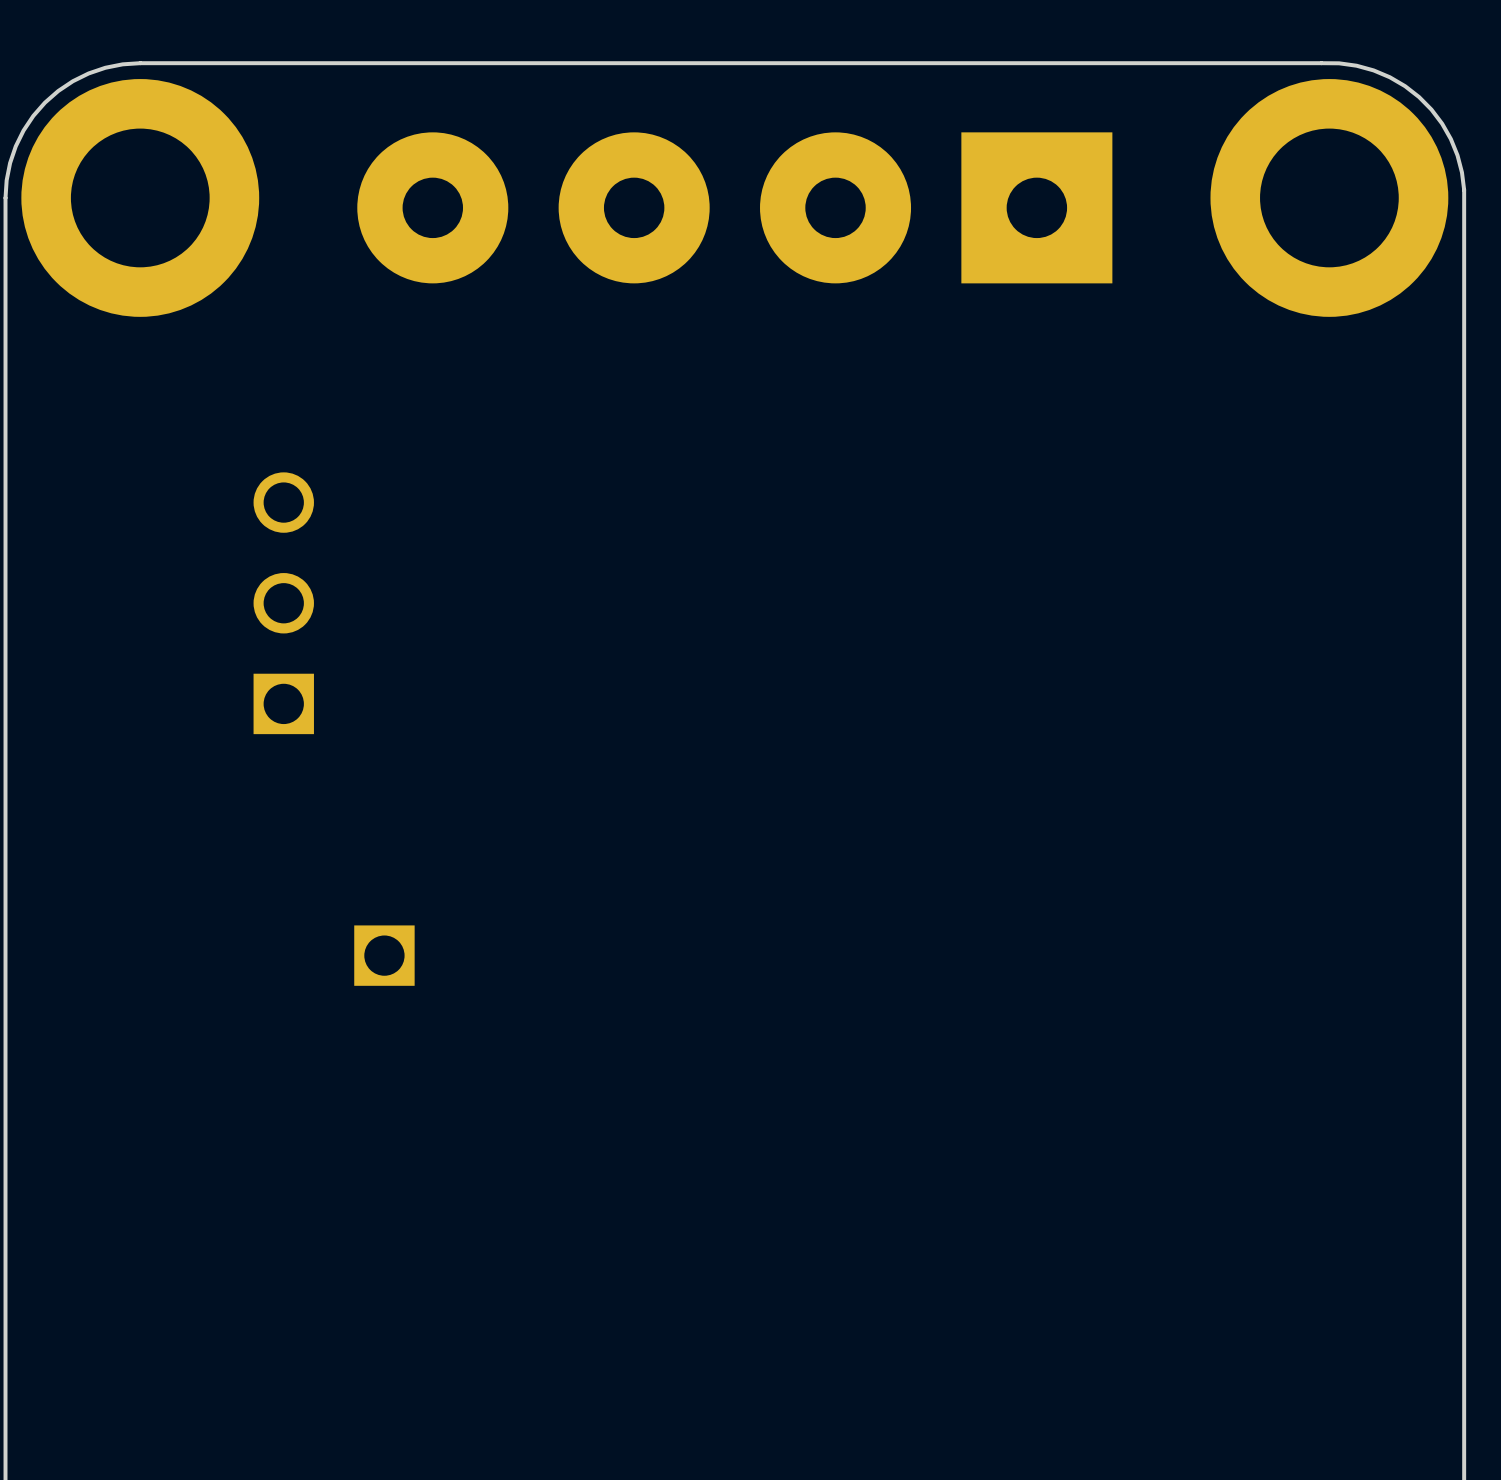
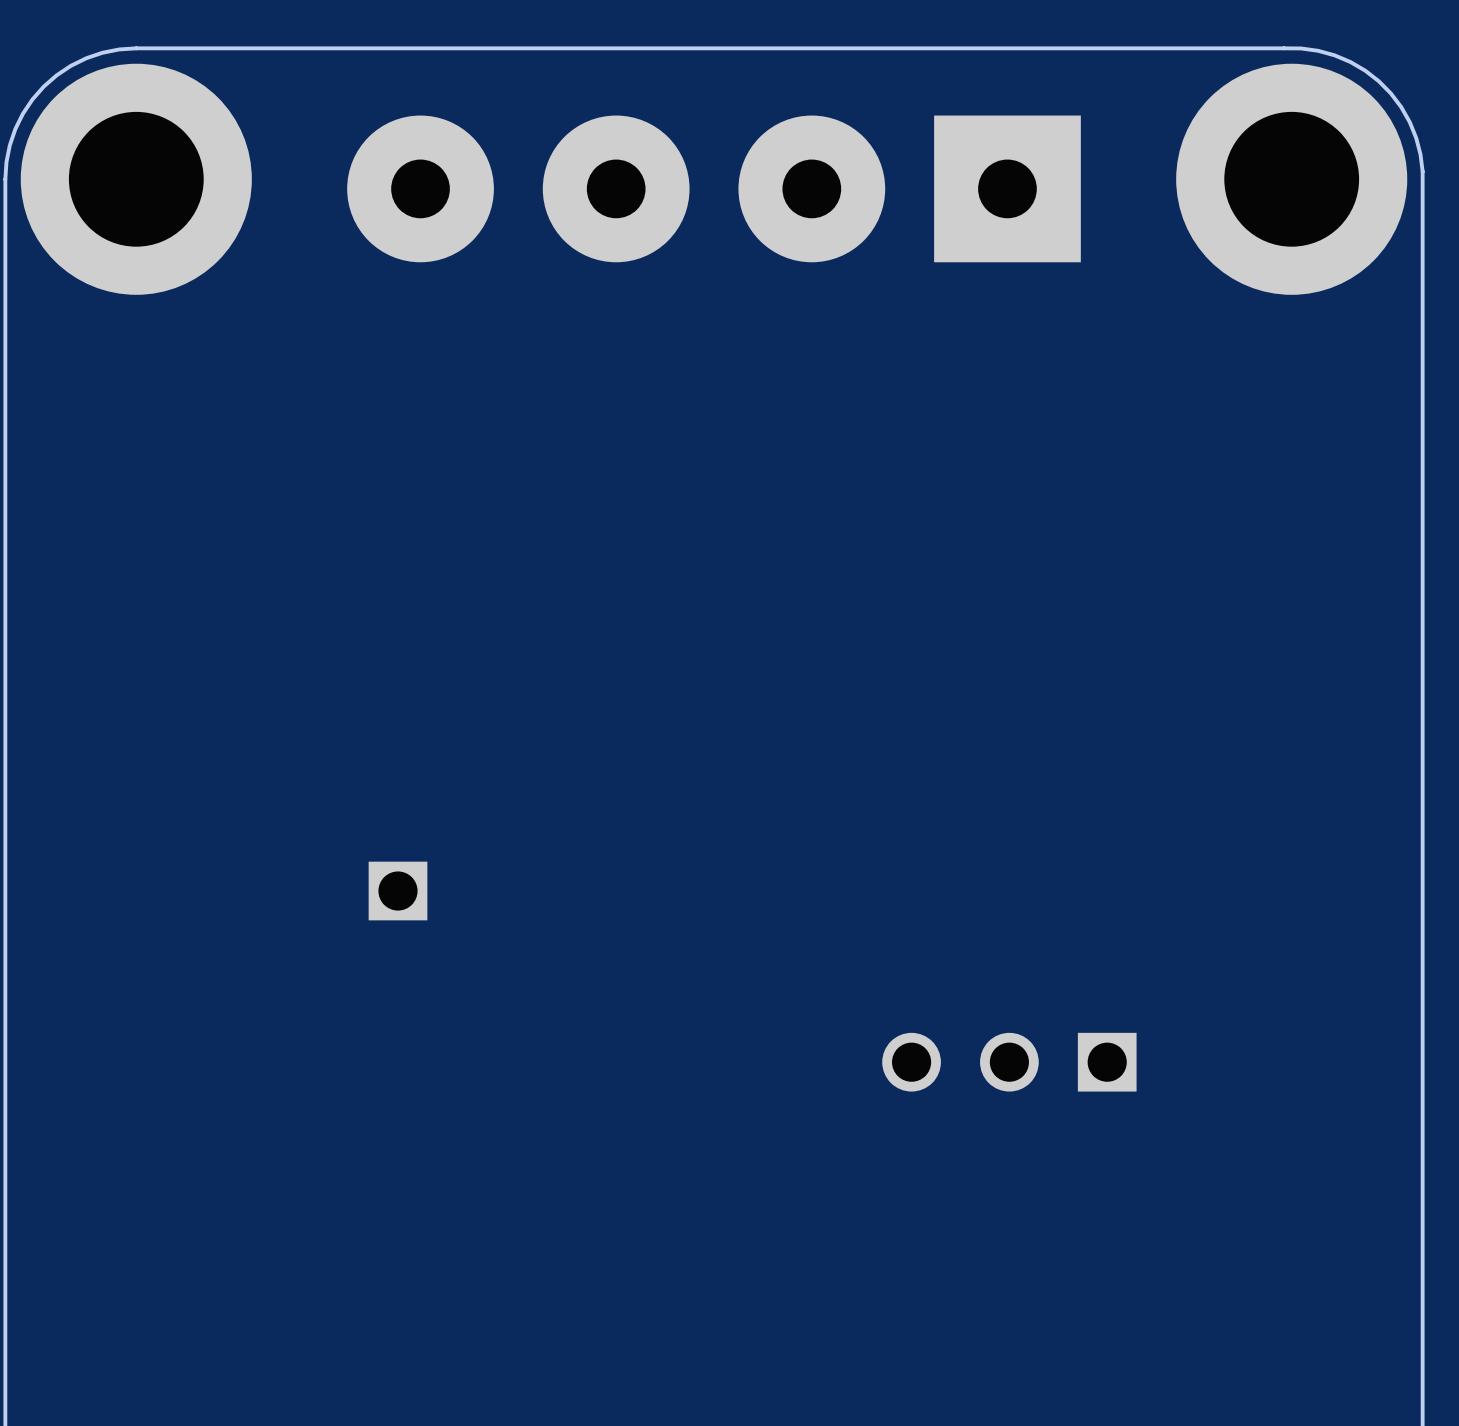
part rotation: 0° (283, 603) -> 90° counterclockwise (1009, 1062)
part position: (283, 603) -> (1009, 1062)
part position: (384, 955) -> (397, 891)

